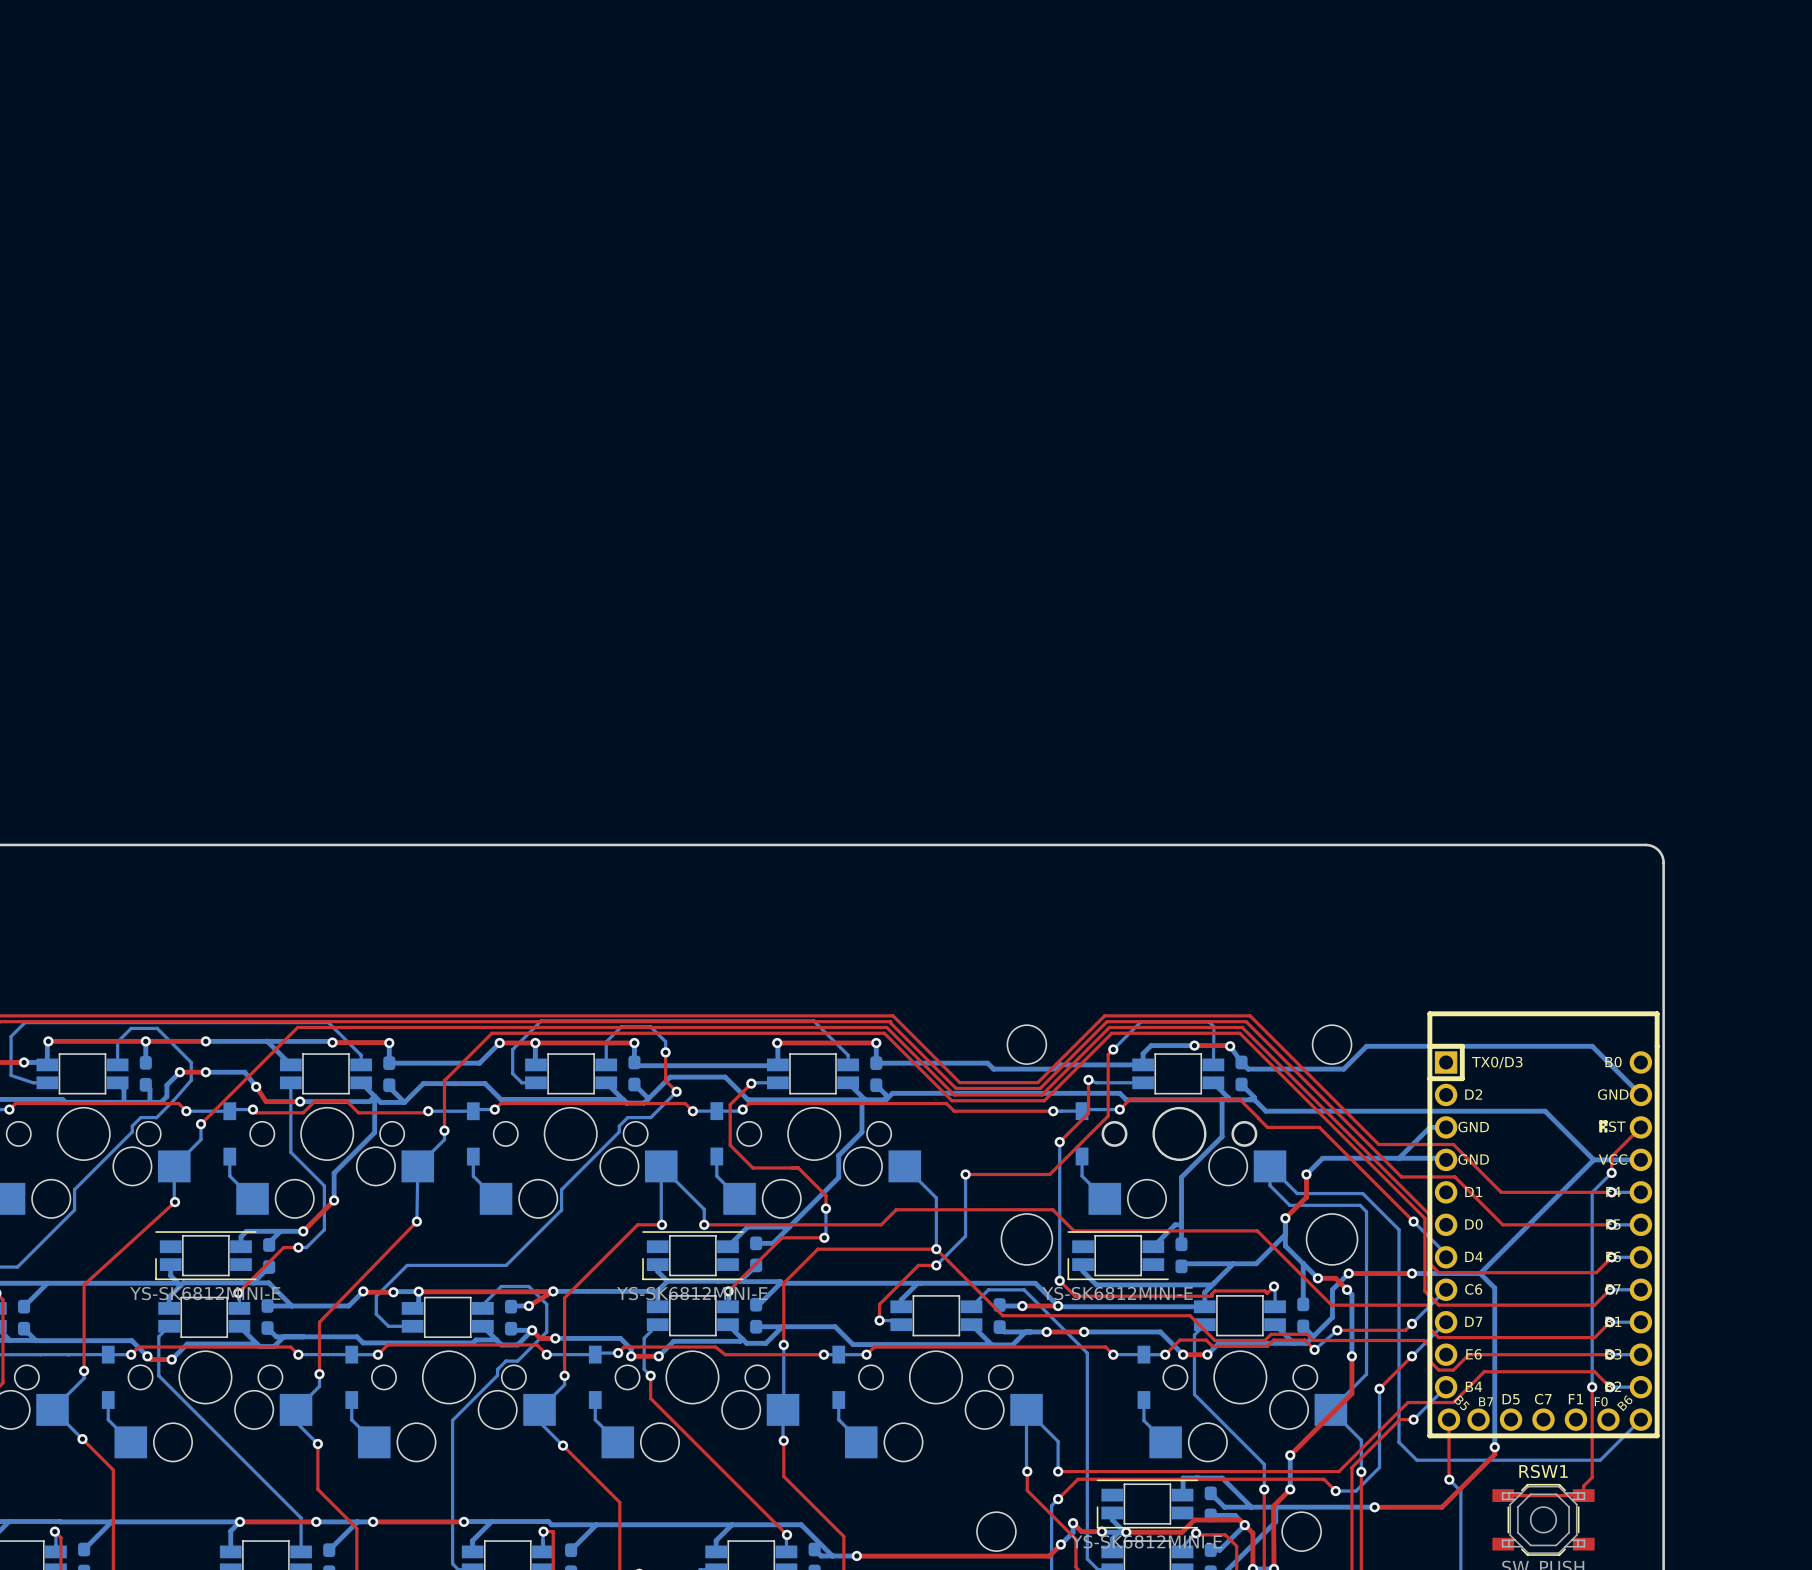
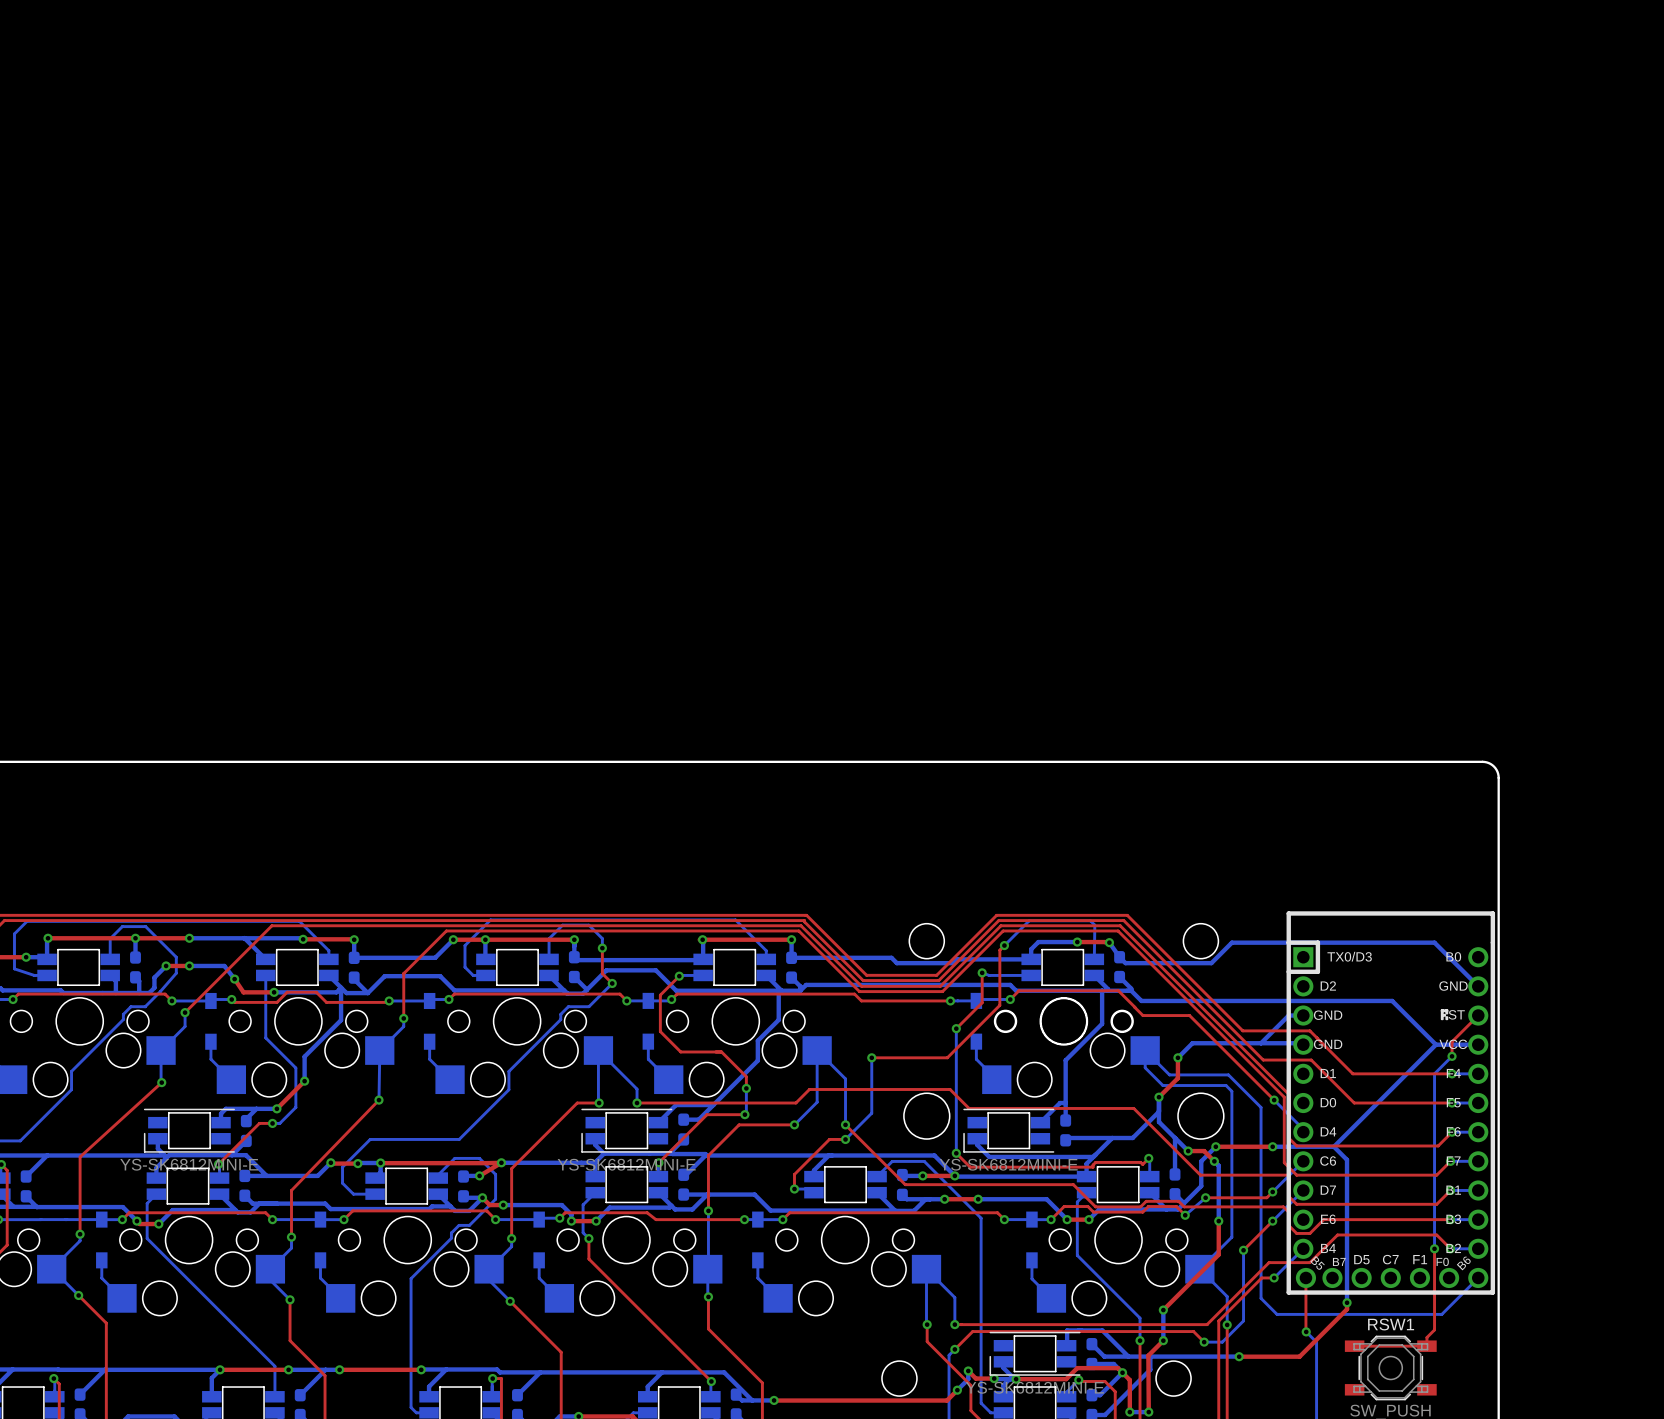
bottom track: none -> (817, 1050) (817, 1102) (794, 1124)
top track: (879, 1249) (936, 1249) -> none
via: none -> (794, 1124)

